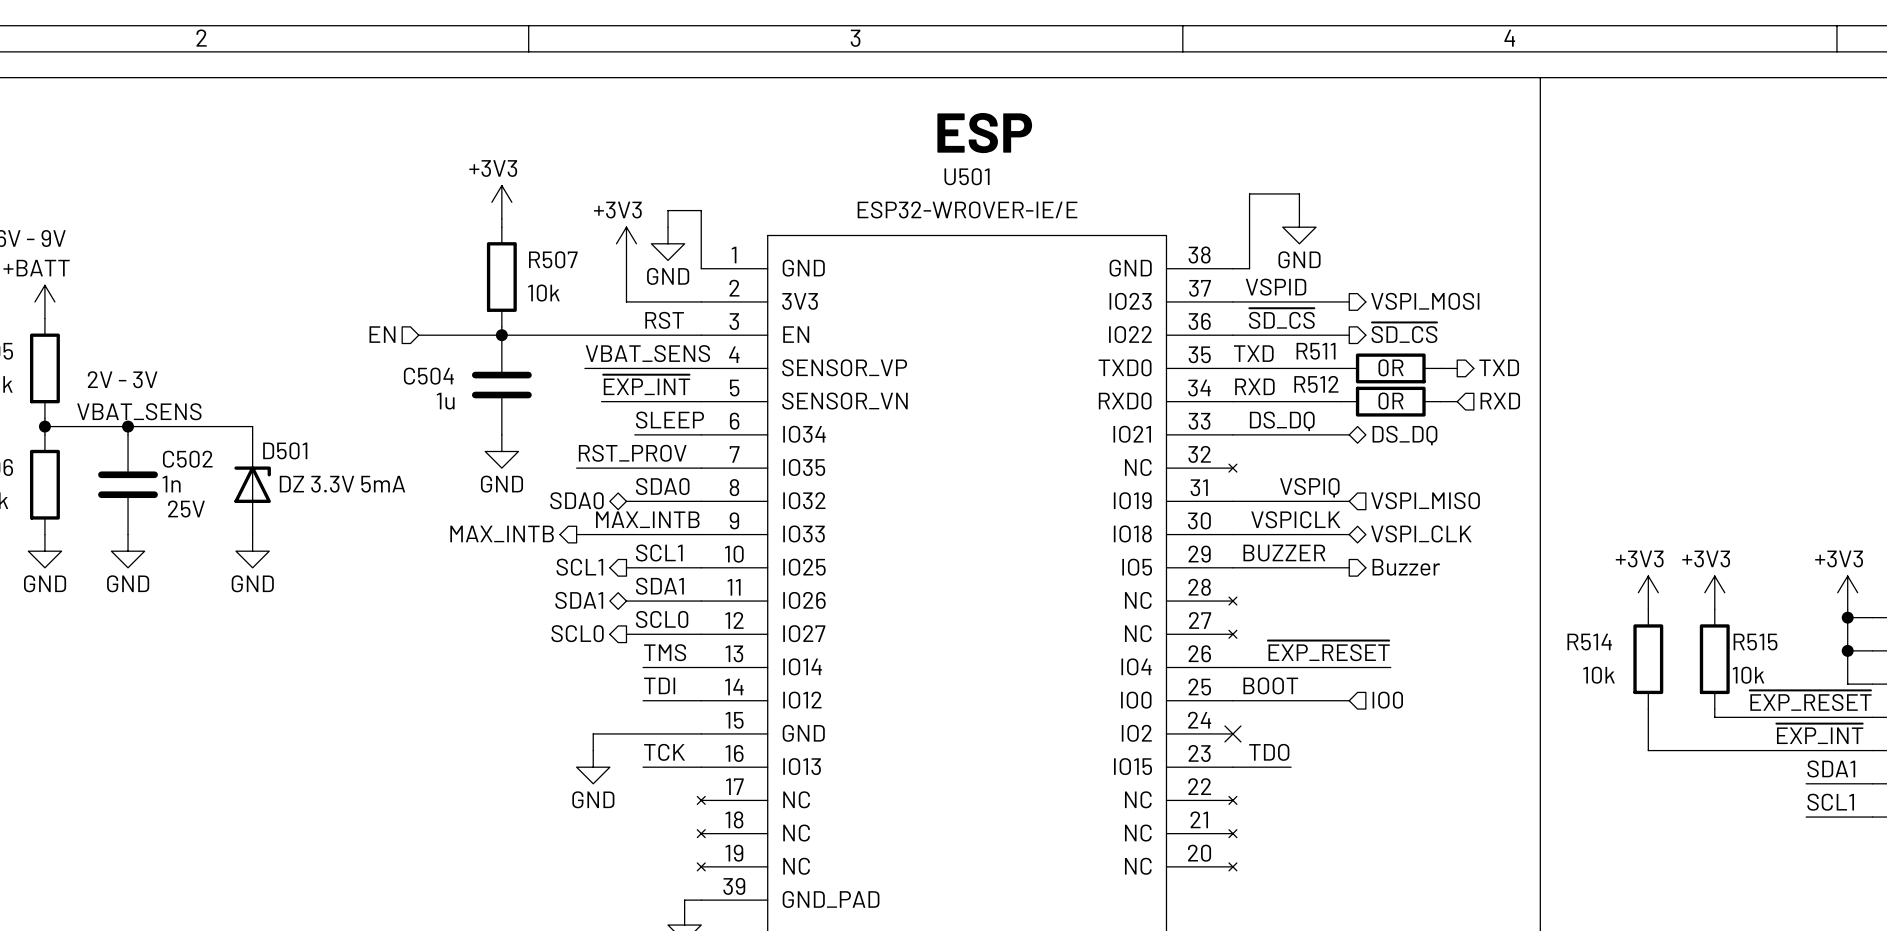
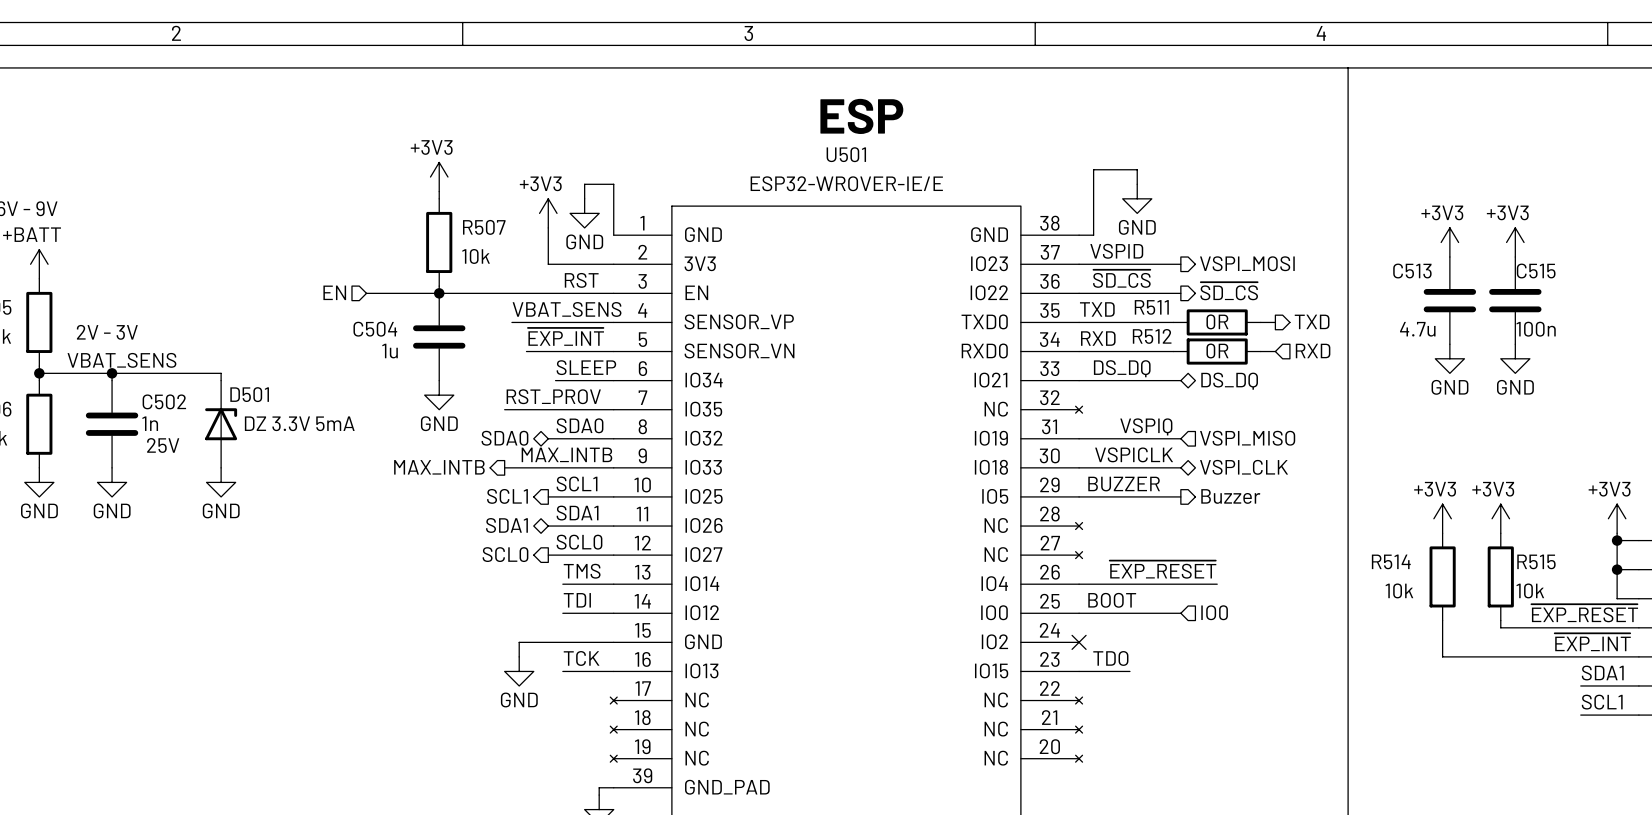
power symbol: none -> +3V3 (1449, 242)
power symbol: none -> +3V3 (1515, 242)
C513: none -> 4.7u (1449, 300)
C515: none -> 100n (1515, 300)
power symbol: none -> GND (1449, 358)
power symbol: none -> GND (1515, 358)

